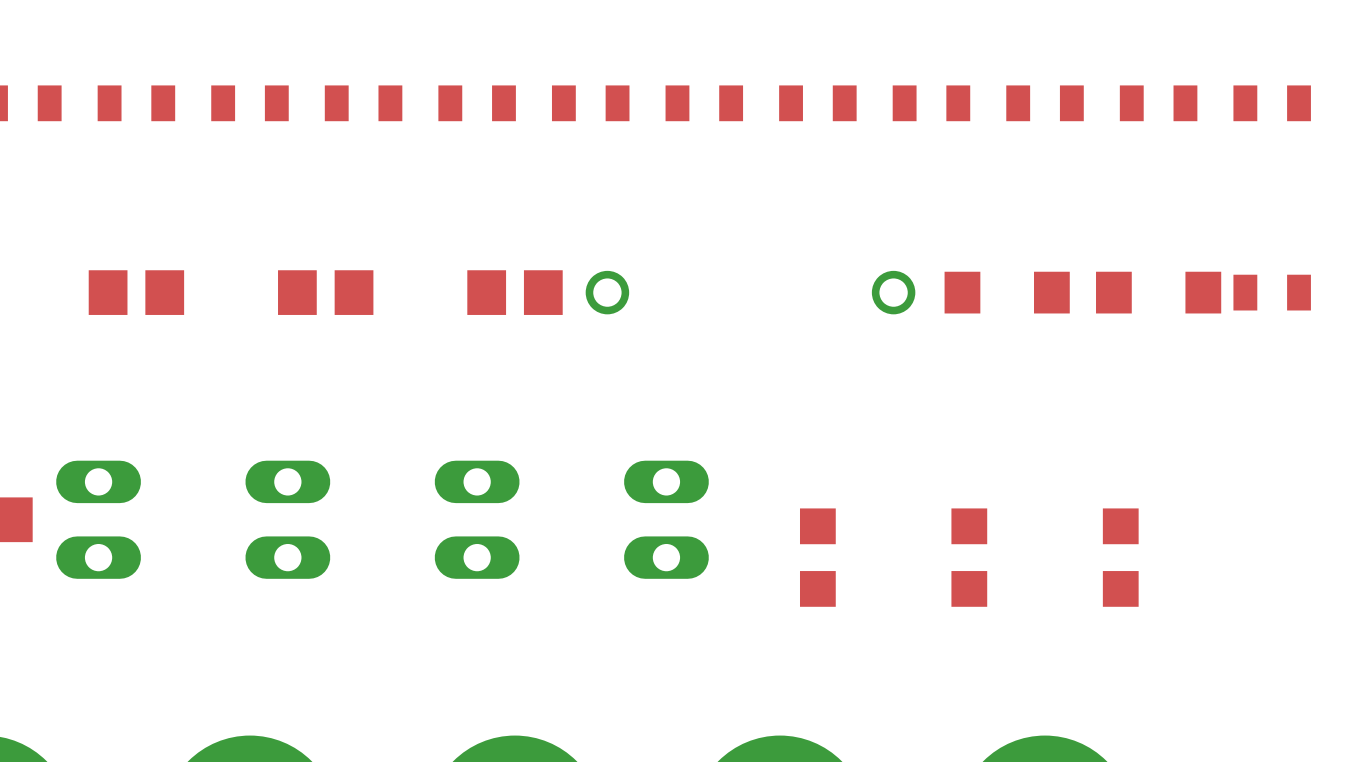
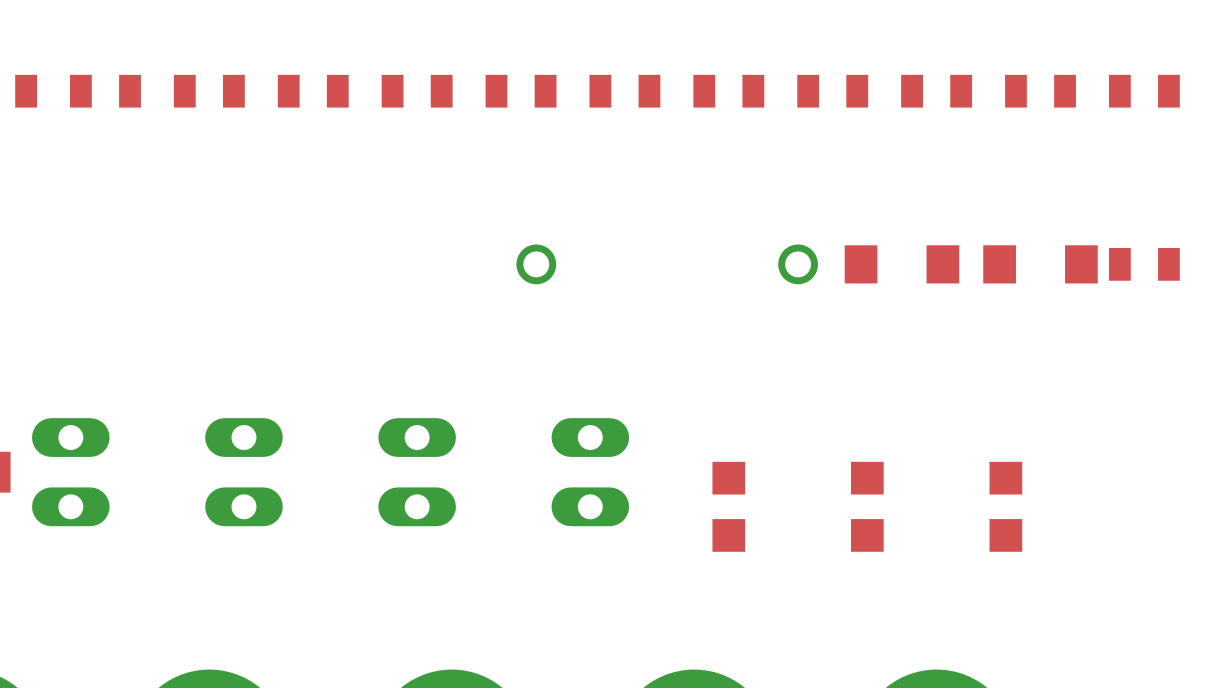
part: (136, 292) -> none
part: (325, 292) -> none
part: (515, 292) -> none

